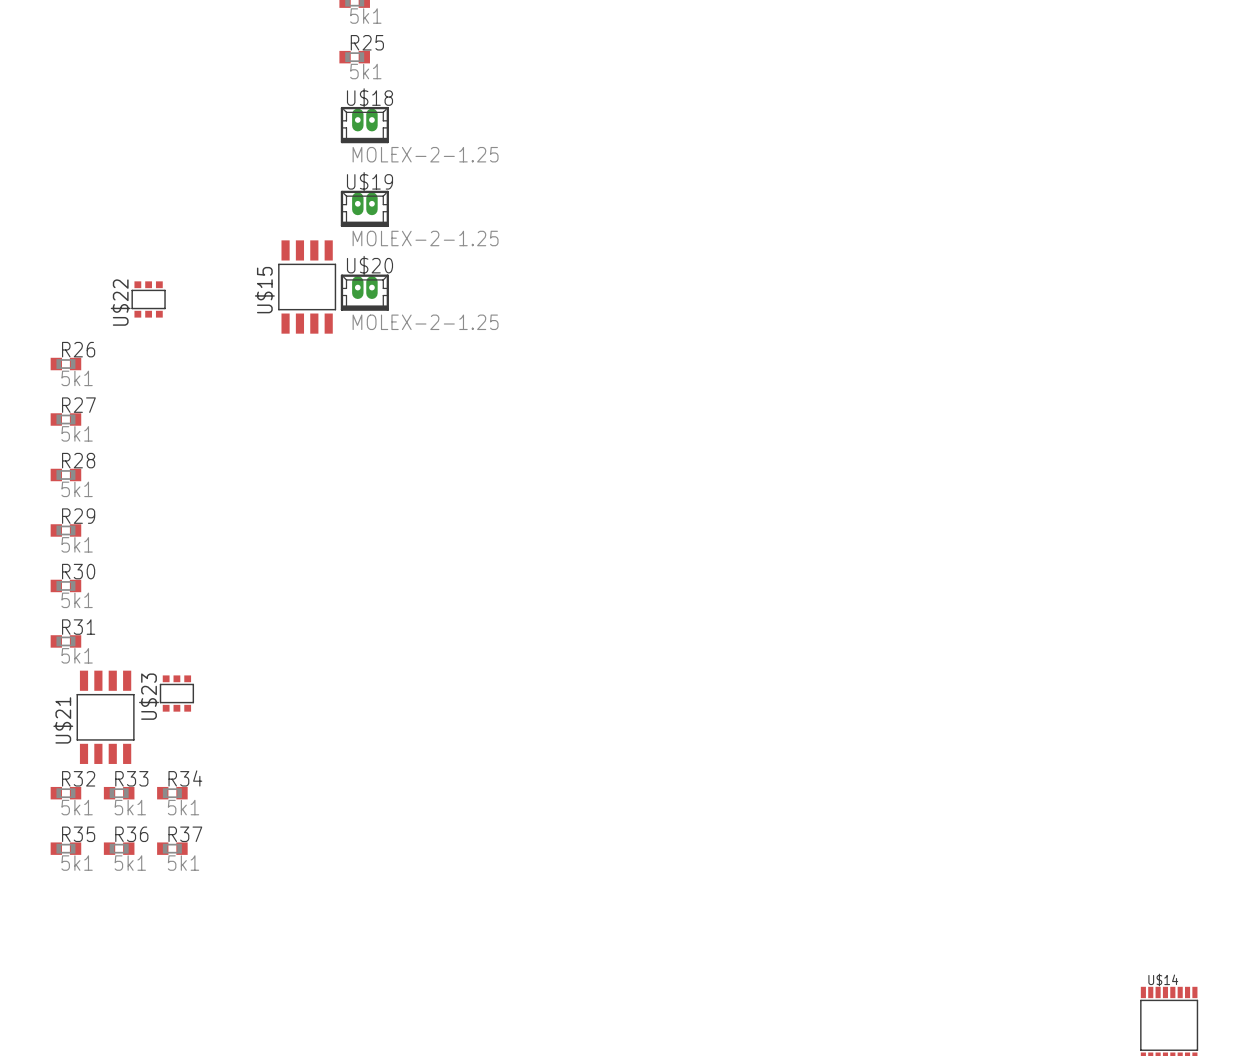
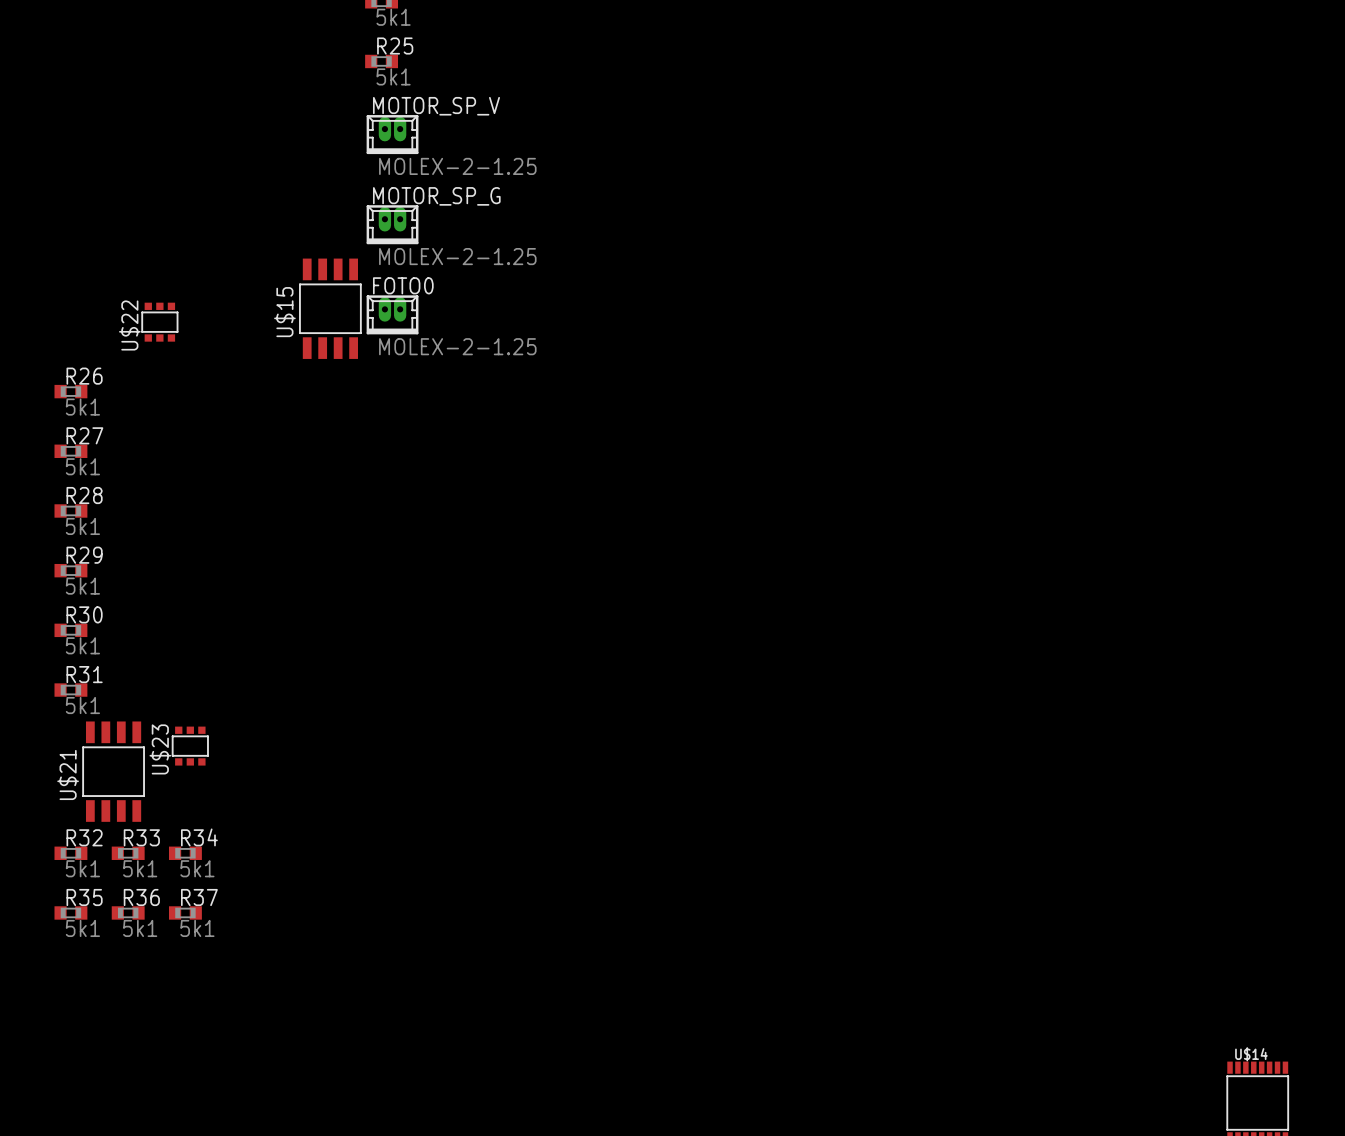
U$18 name: U$18 (369, 98) -> MOTOR_SP_V (436, 106)
U$19 name: U$19 (369, 181) -> MOTOR_SP_G (436, 196)
U$20 name: U$20 (369, 265) -> FOTO0 (403, 285)

